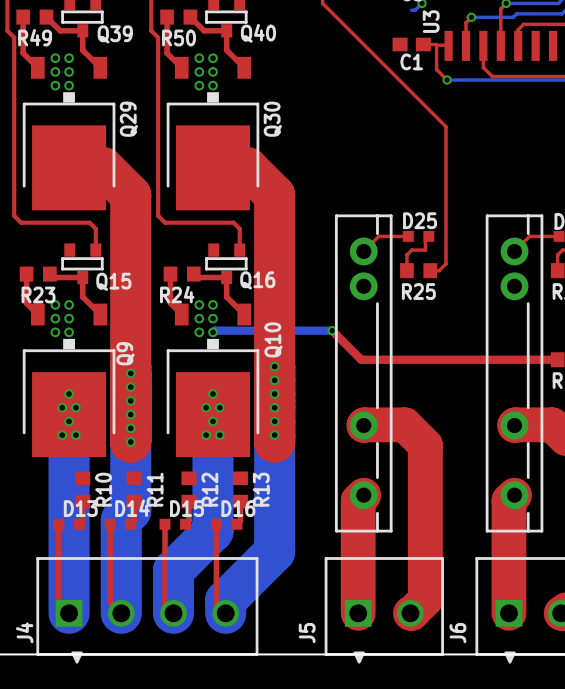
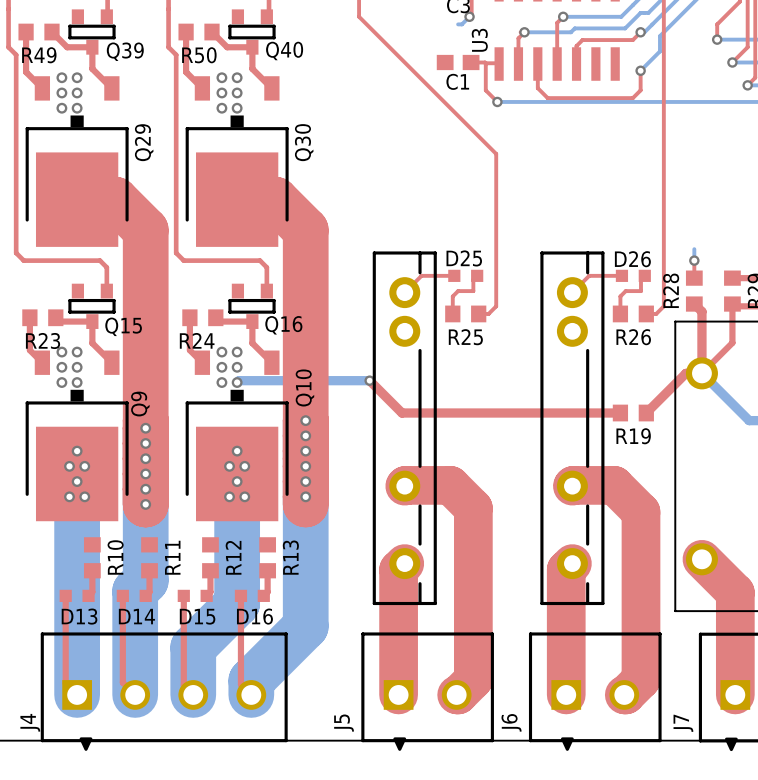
D13 name position: D13 (80, 508) -> D13 (79, 616)
D14 name position: D14 (132, 508) -> D14 (136, 616)
D15 name position: D15 (187, 508) -> D15 (197, 616)
D16 name position: D16 (238, 508) -> D16 (254, 616)

